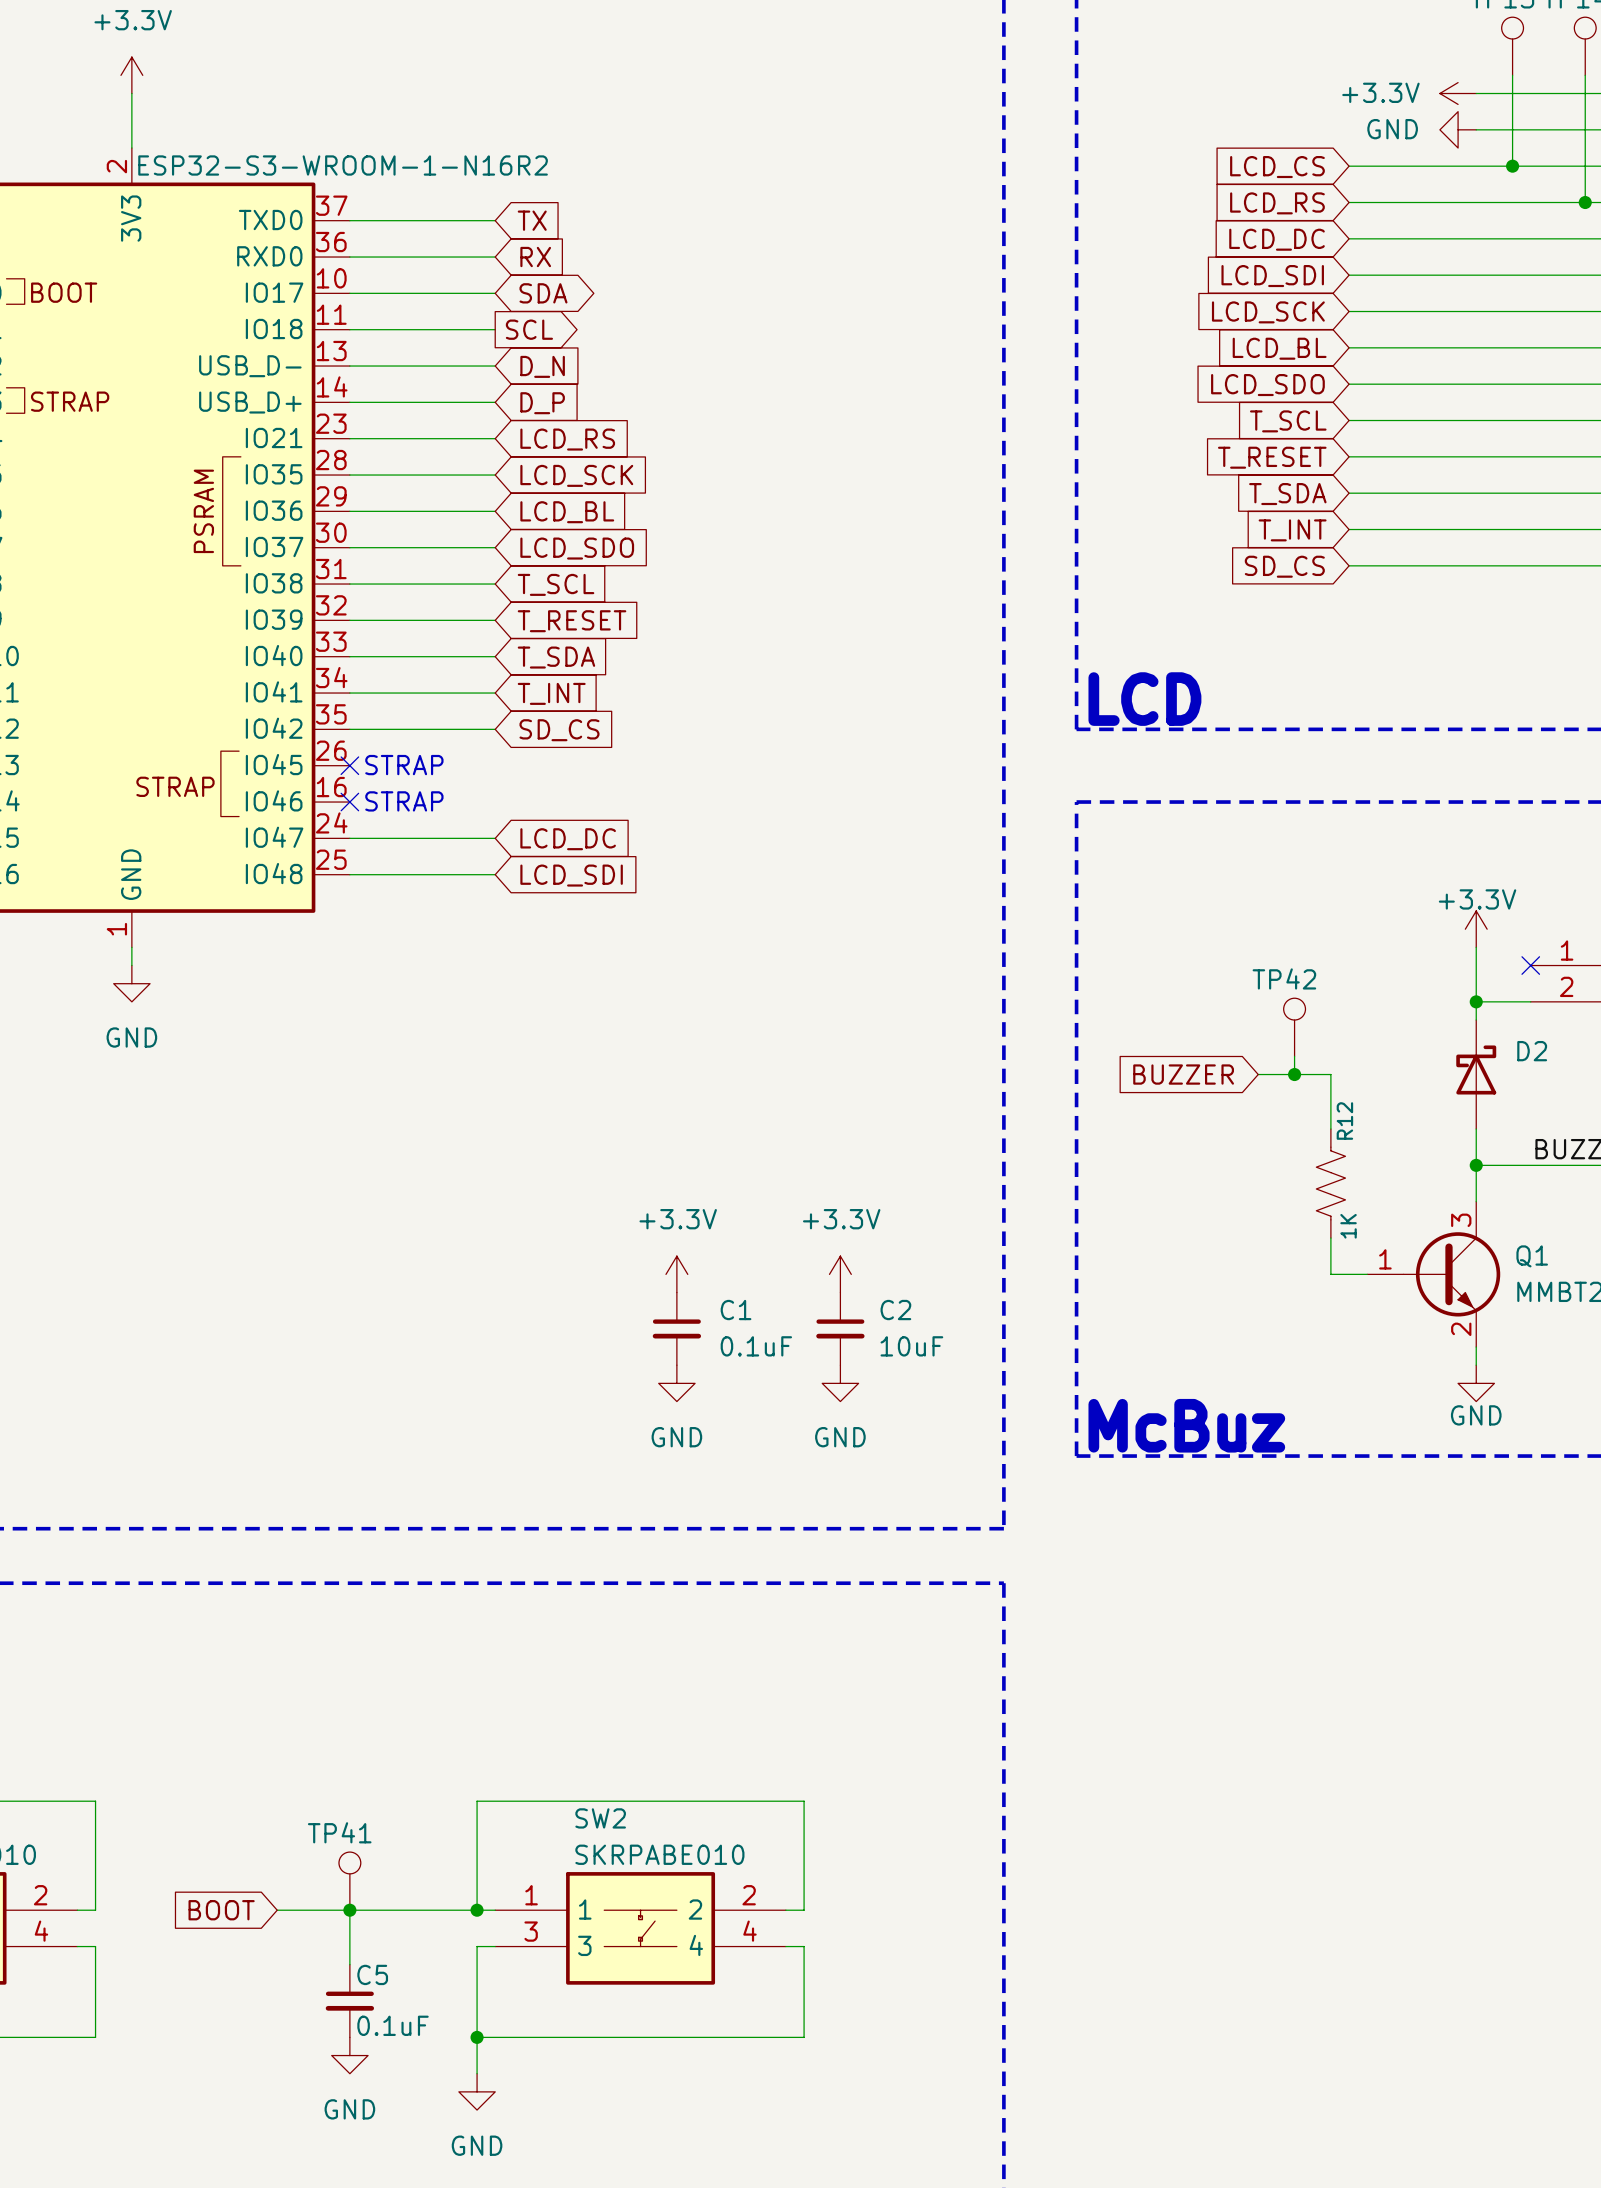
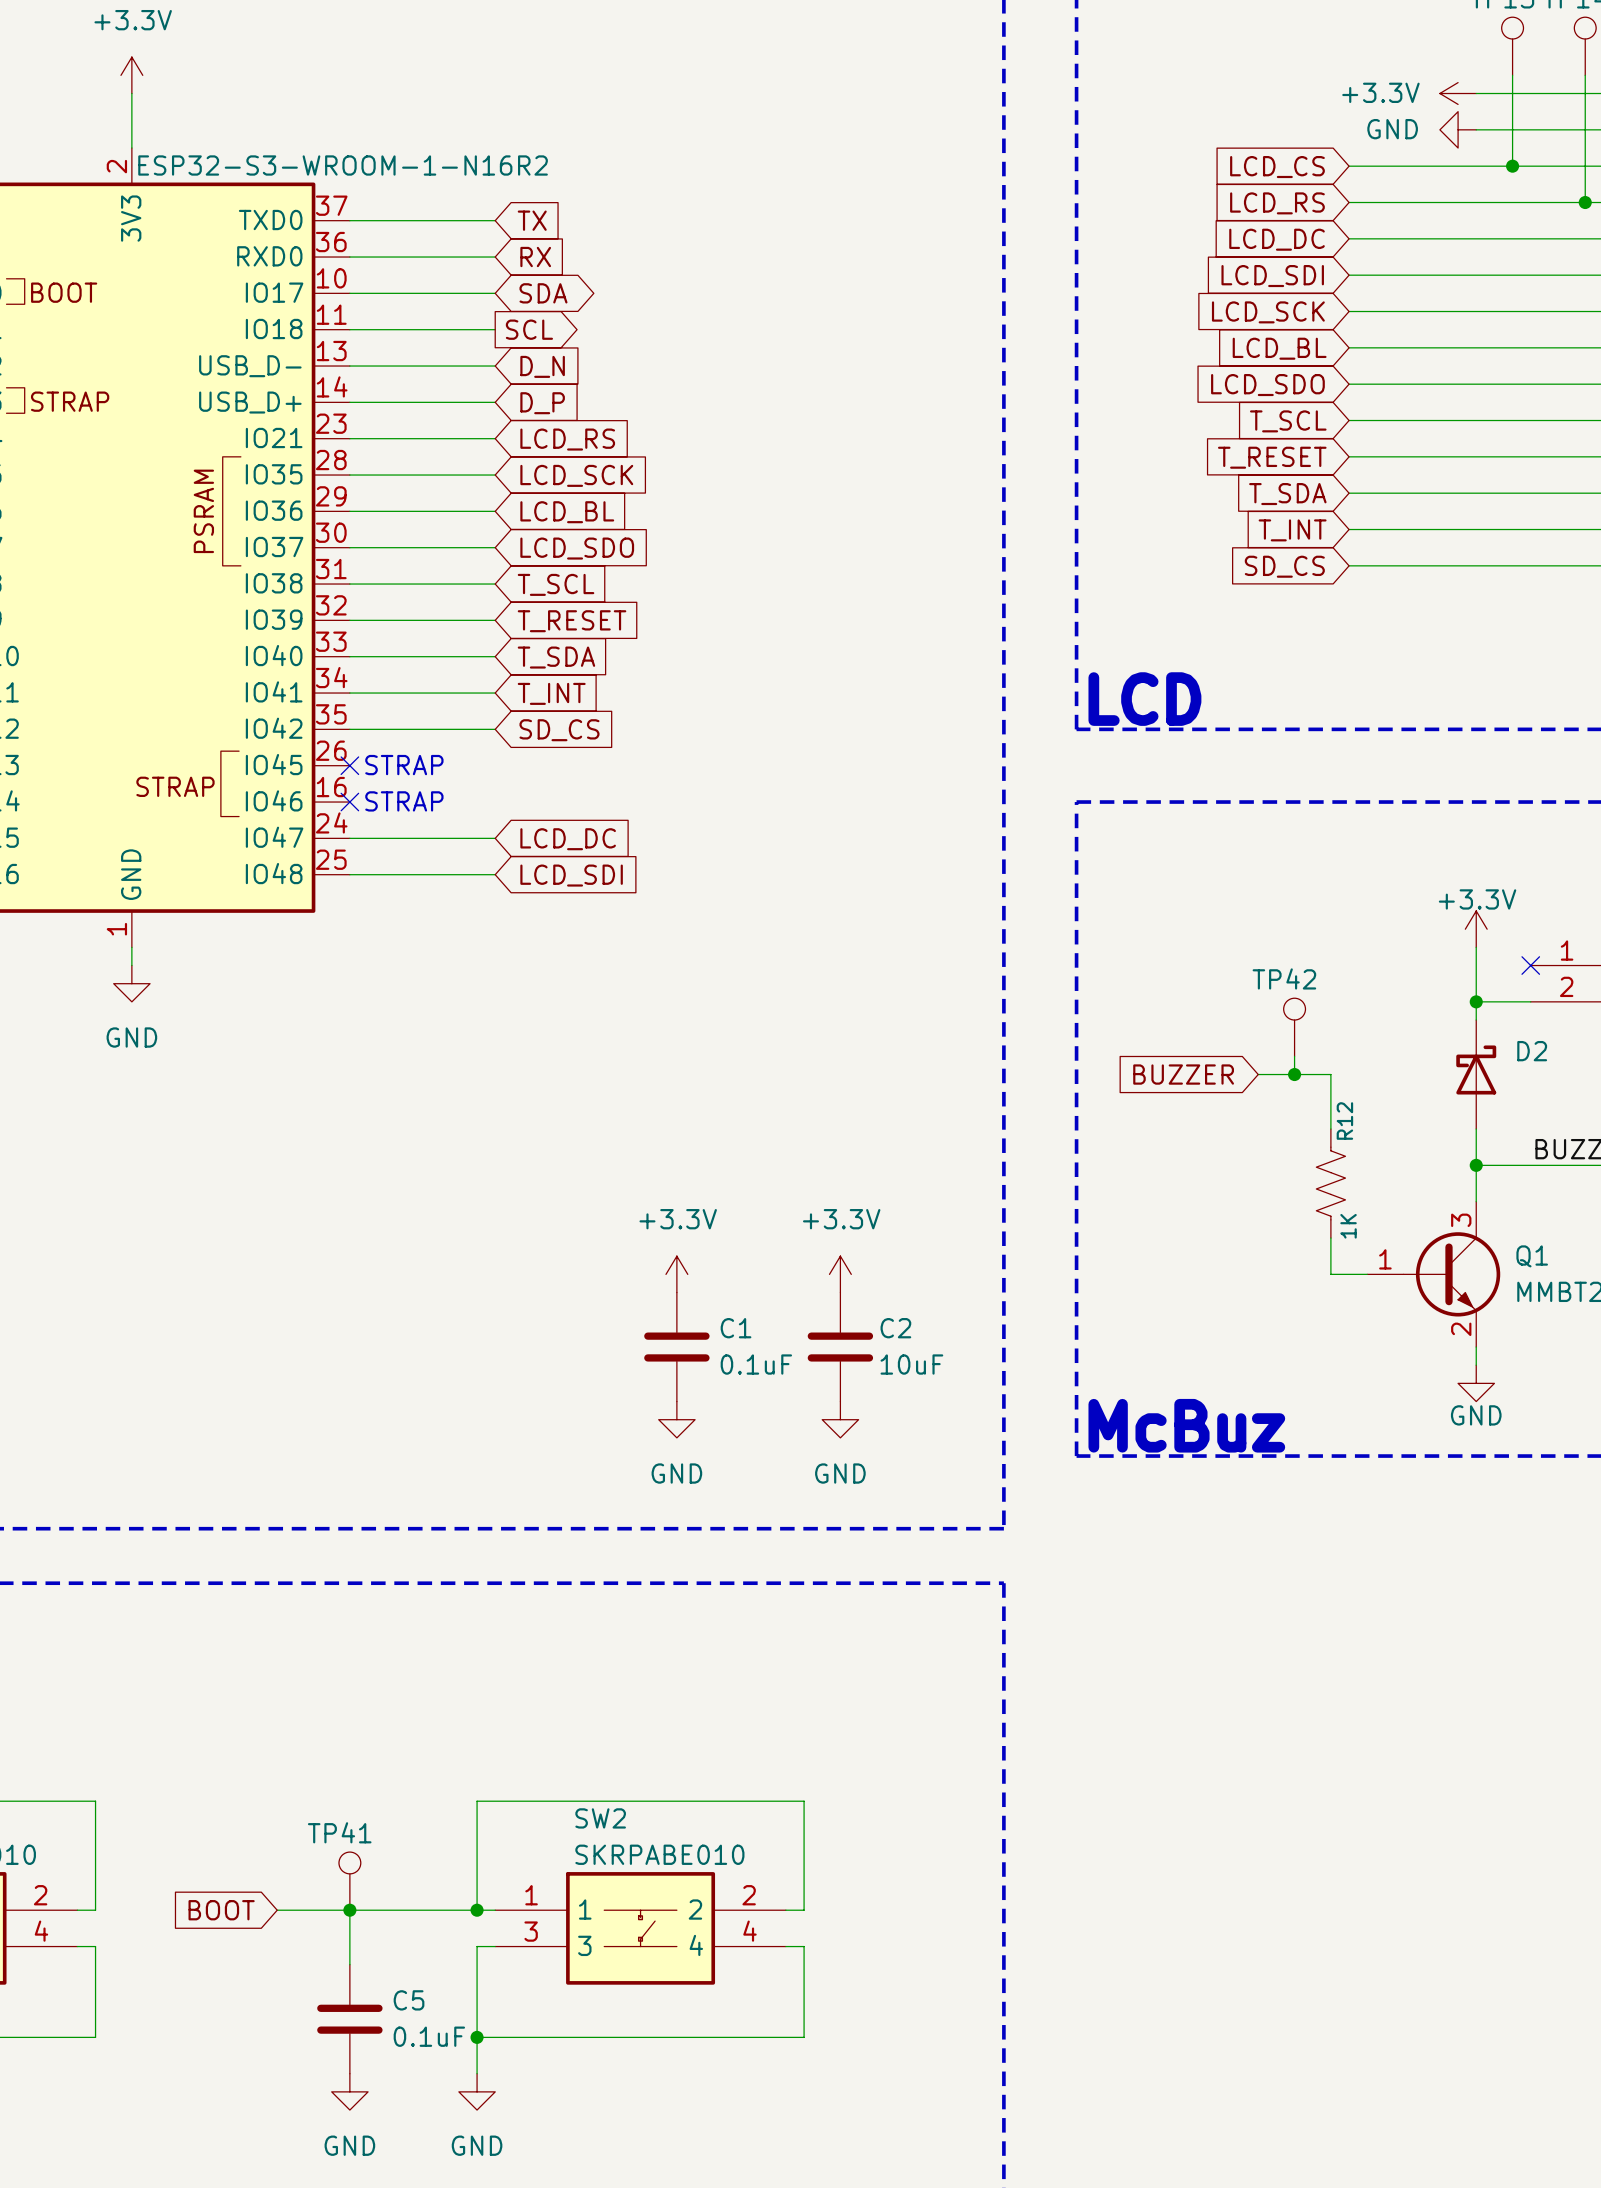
C1 symbol: [652, 1292, 702, 1366] -> [644, 1292, 710, 1402]
C2 symbol: [816, 1292, 865, 1366] -> [807, 1292, 874, 1402]
power symbol position: GND (676, 1383) -> GND (676, 1419)
power symbol position: GND (840, 1383) -> GND (840, 1419)
C5 symbol: [325, 1964, 375, 2038] -> [317, 1964, 383, 2074]
C5 name position: C5 (372, 1974) -> C5 (409, 2000)
C5 value position: 0.1uF (393, 2025) -> 0.1uF (429, 2036)
power symbol position: GND (349, 2055) -> GND (349, 2091)

